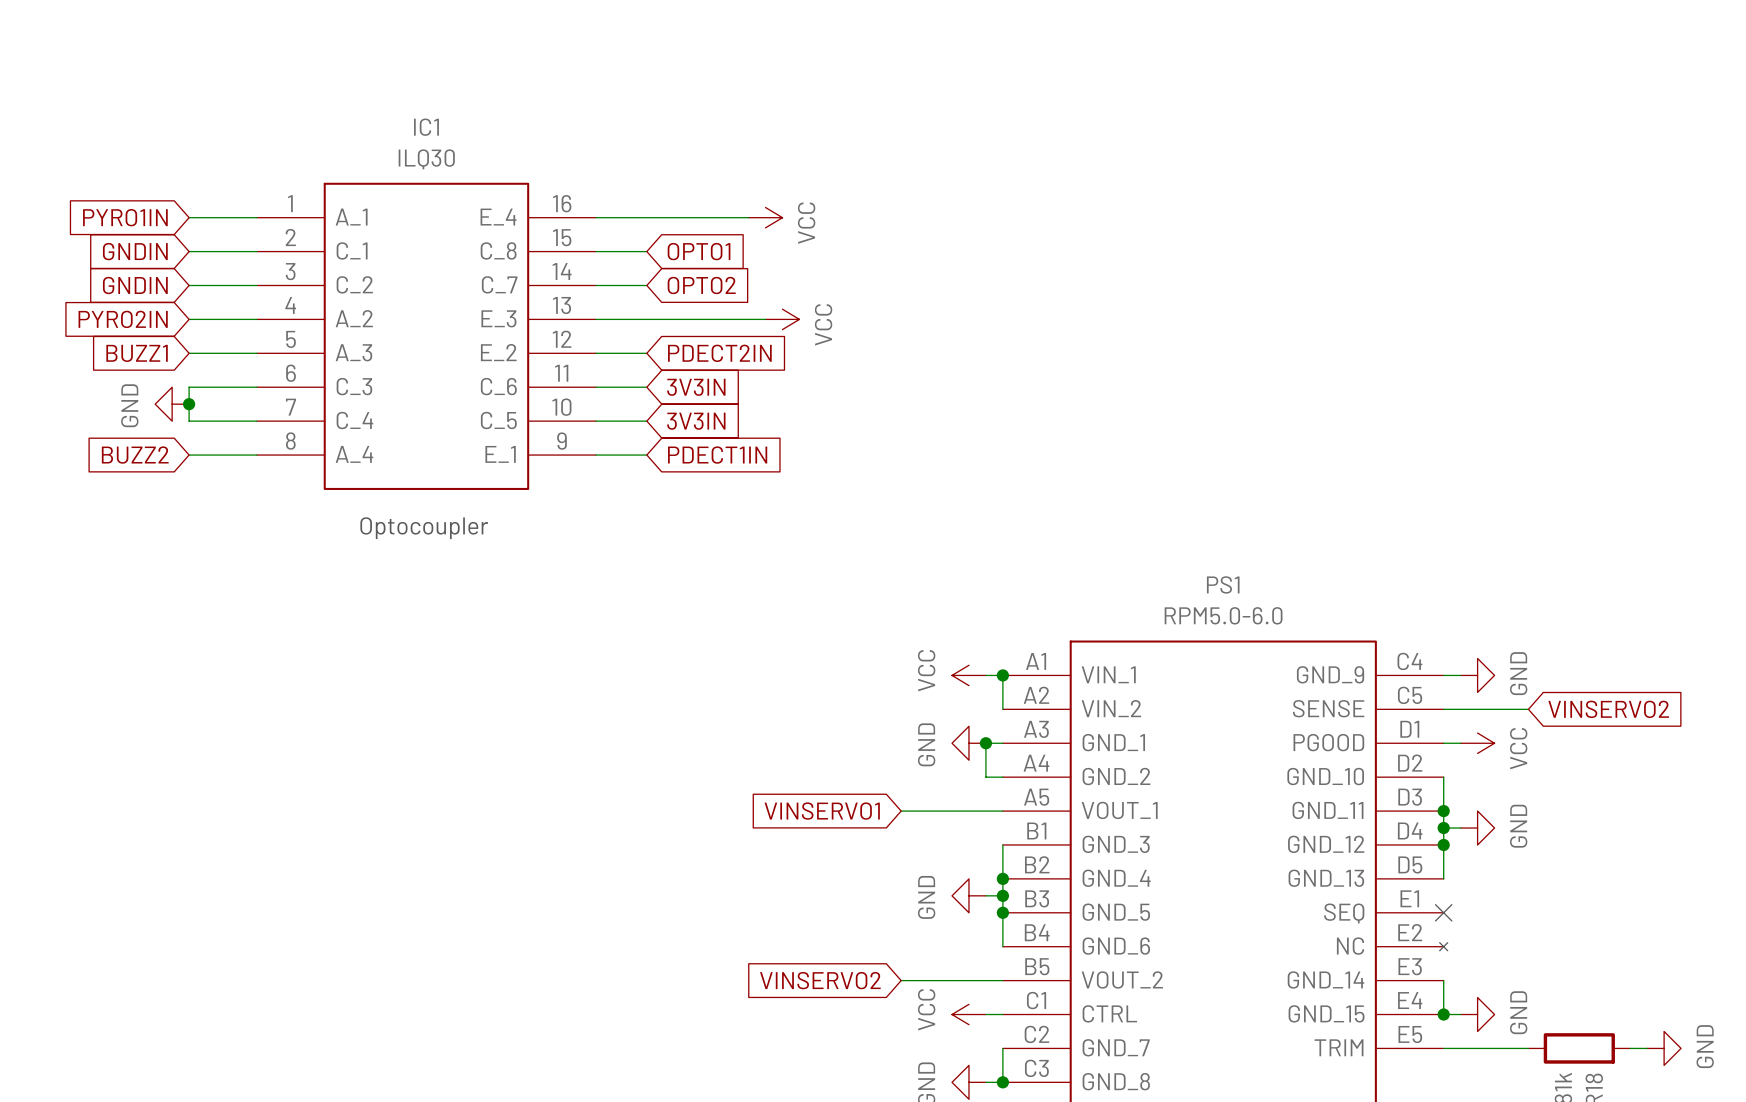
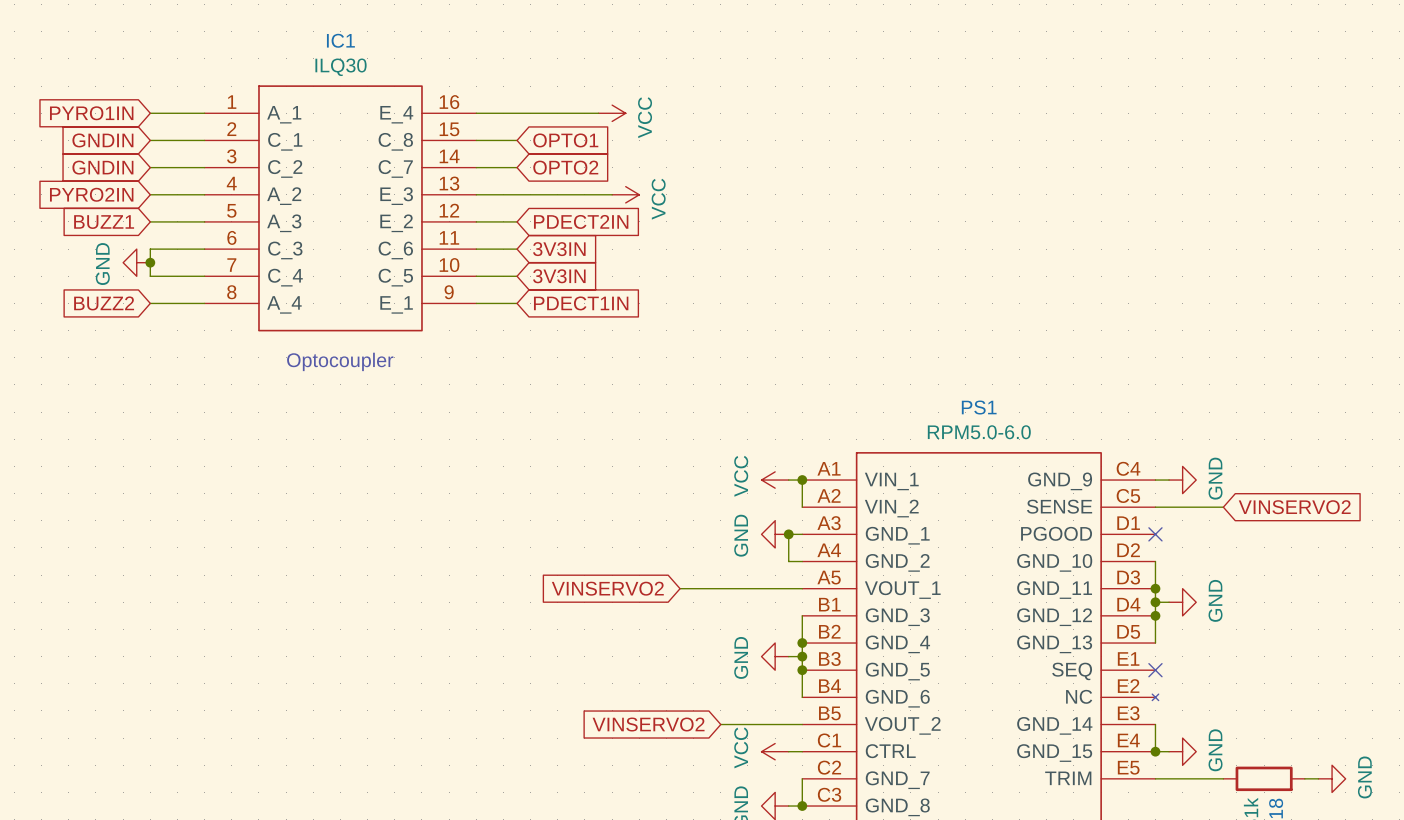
wire: (1443, 743) (1460, 743) -> none
no-connect mark: none -> (1155, 534)
power symbol: VCC (1477, 743) -> none
global label: VINSERVO1 (822, 811) -> VINSERVO2 (607, 588)
wire: none -> (680, 588) (720, 588)

